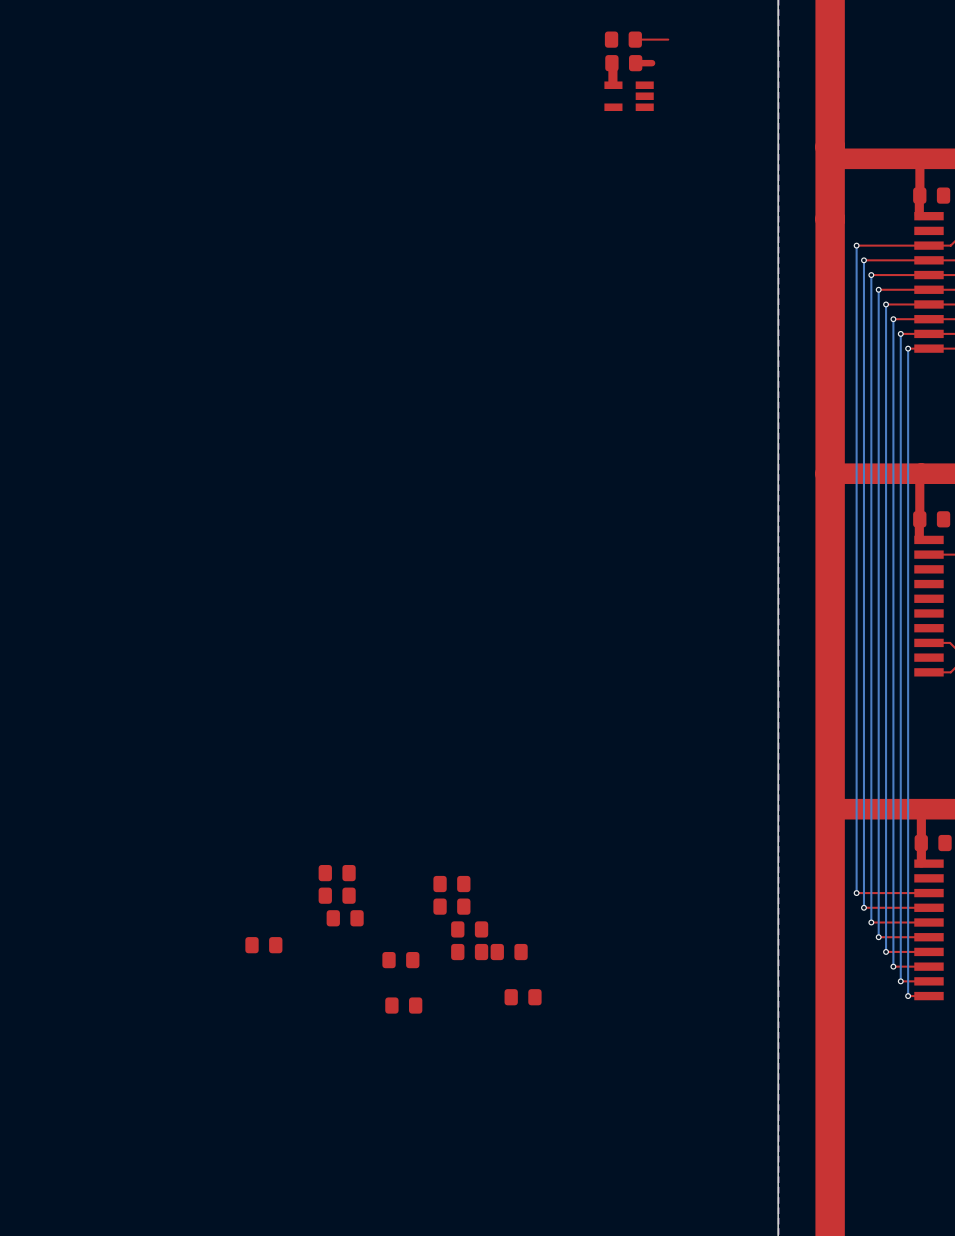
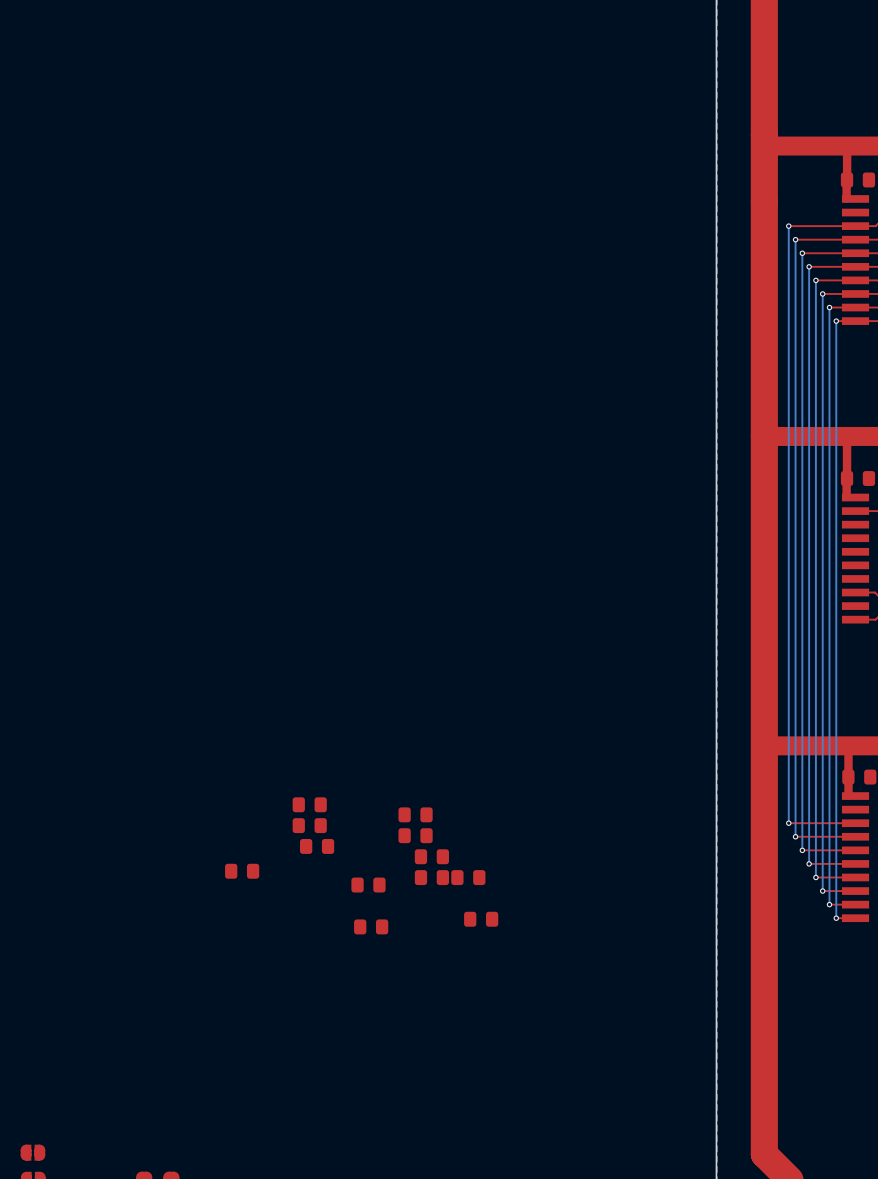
part: (623, 39) -> none
top track: (668, 39) (635, 39) -> none
top track: (612, 63) (612, 83) -> none
part: (623, 63) -> none
top track: (652, 63) (635, 63) -> none
part: (629, 96) -> none

